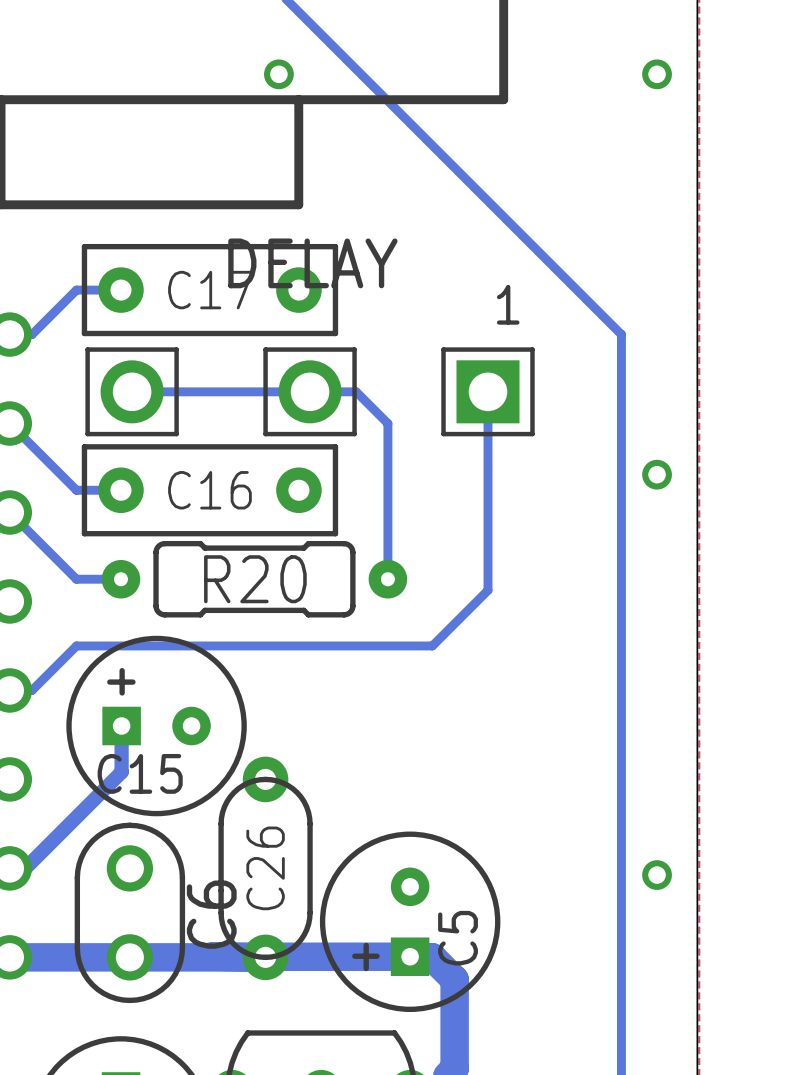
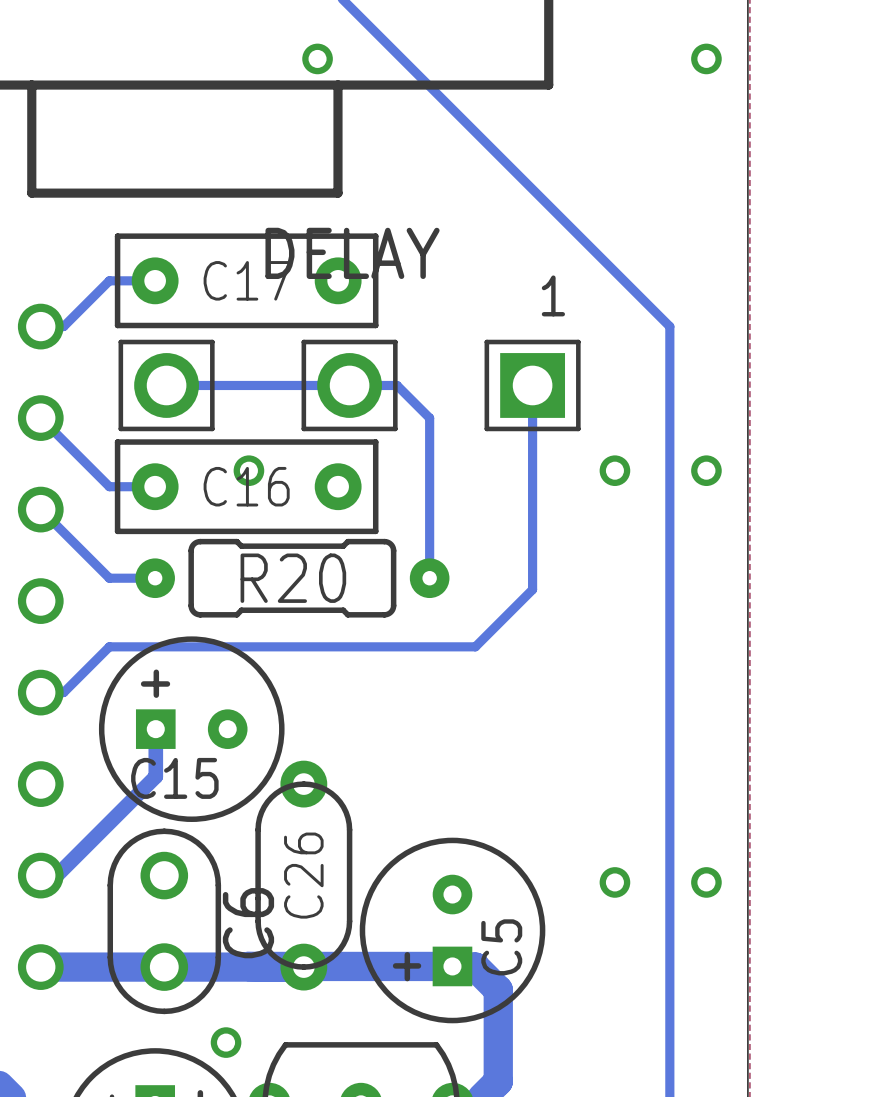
via: none -> (248, 470)
via: none -> (614, 470)
via: none -> (614, 882)
via: none -> (226, 1042)

